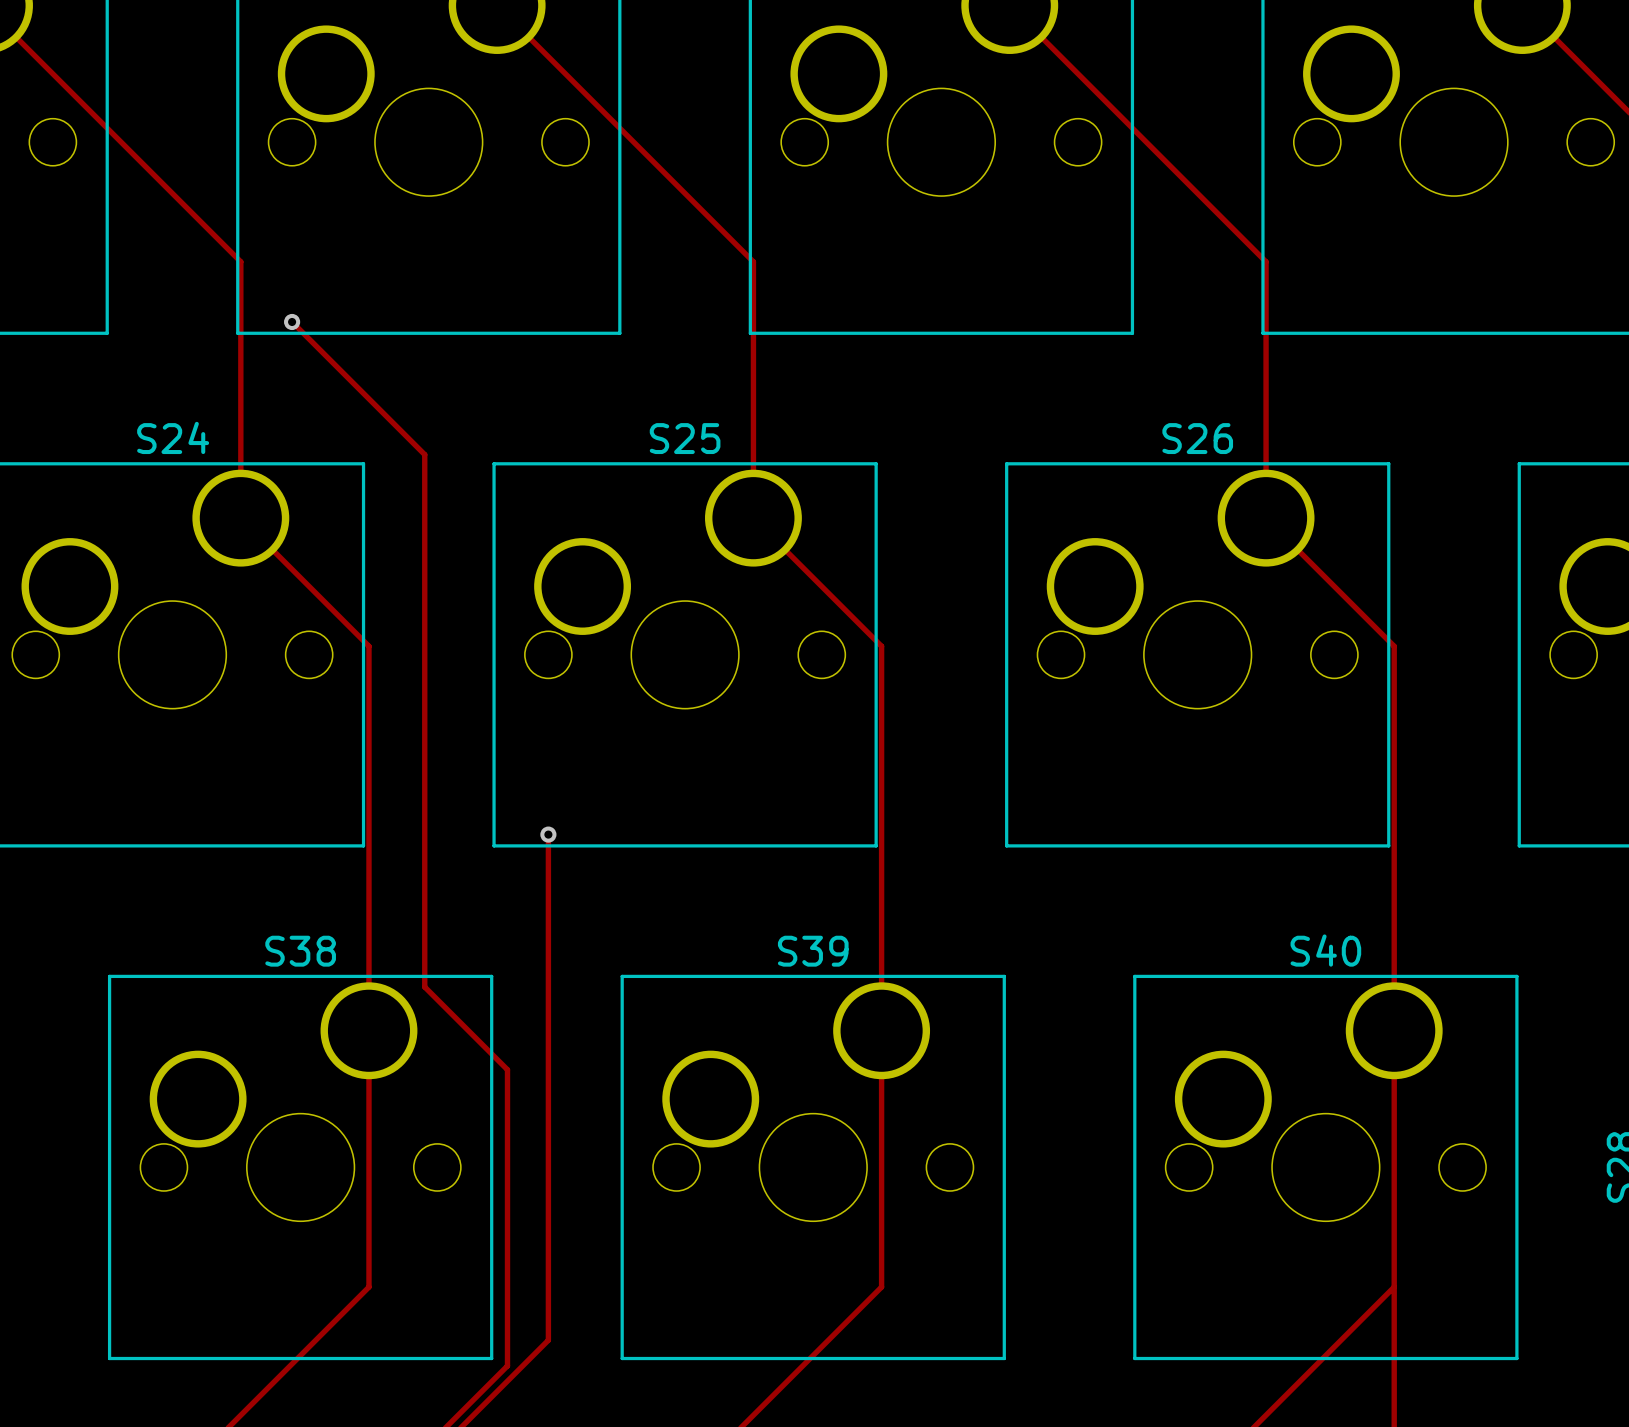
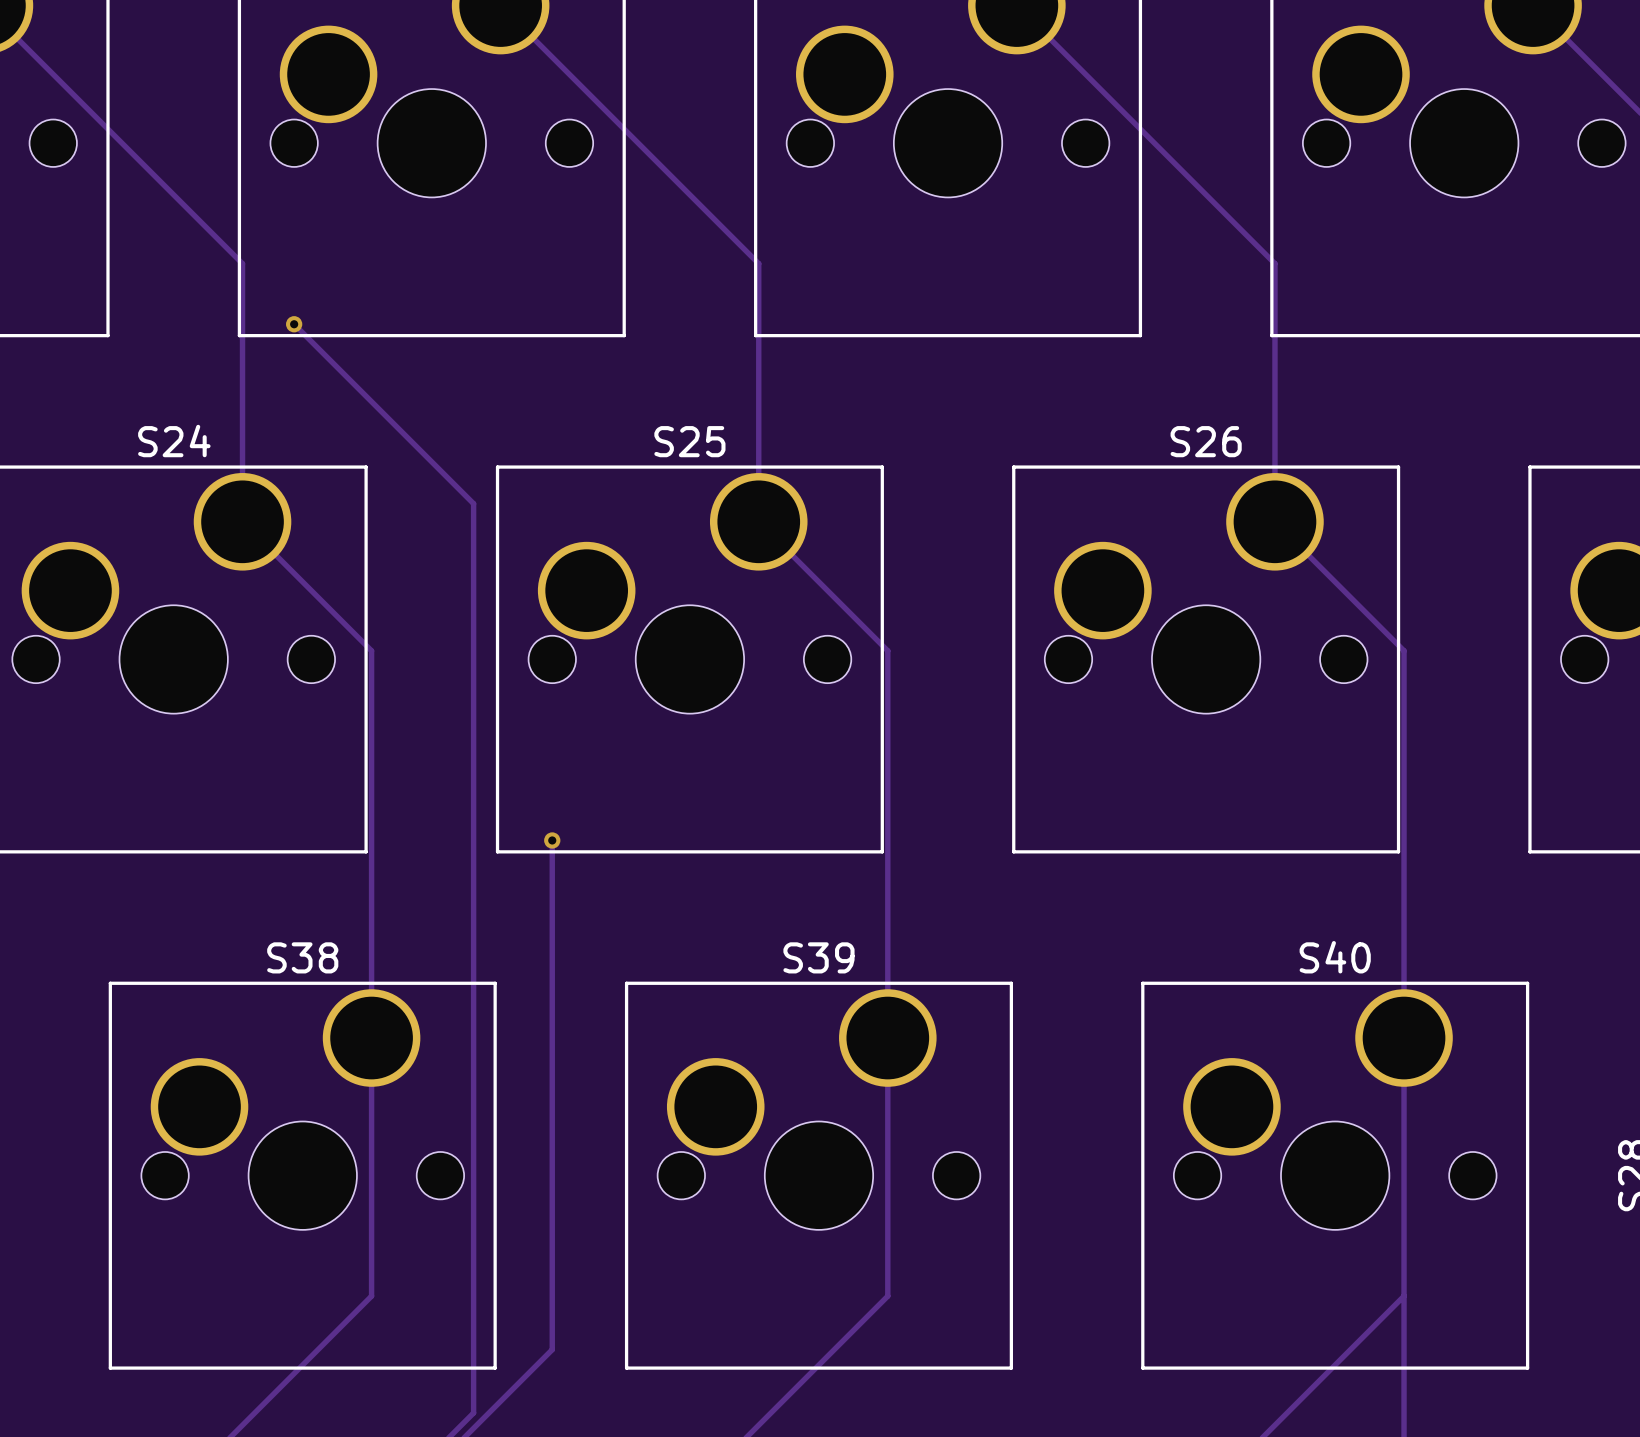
track: (424, 454) (424, 987) (507, 1069) (507, 1365) (470, 1403) -> (427, 457) (473, 503) (473, 1413)

